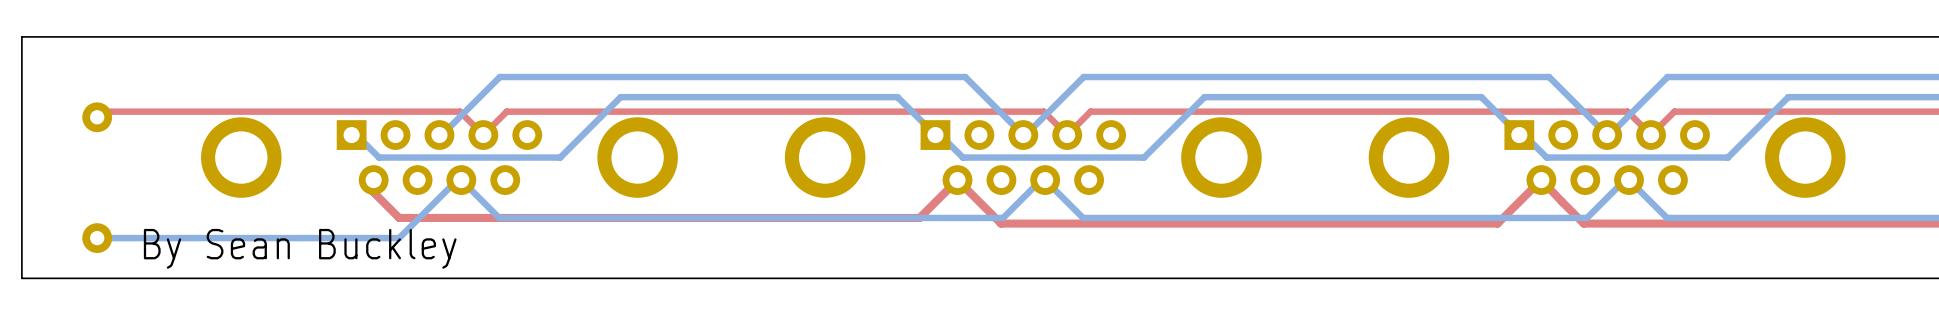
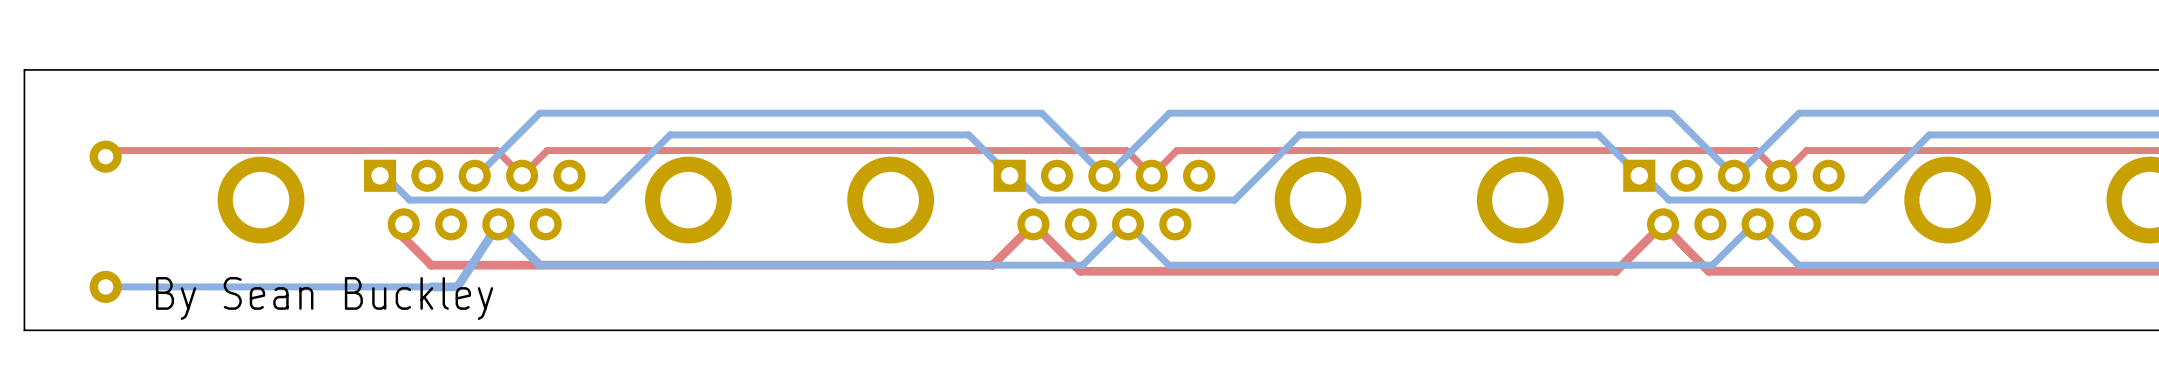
bottom track: (499, 217) (461, 180) (457, 180) (399, 238) -> (539, 265) (498, 224) (457, 286) (431, 286)

